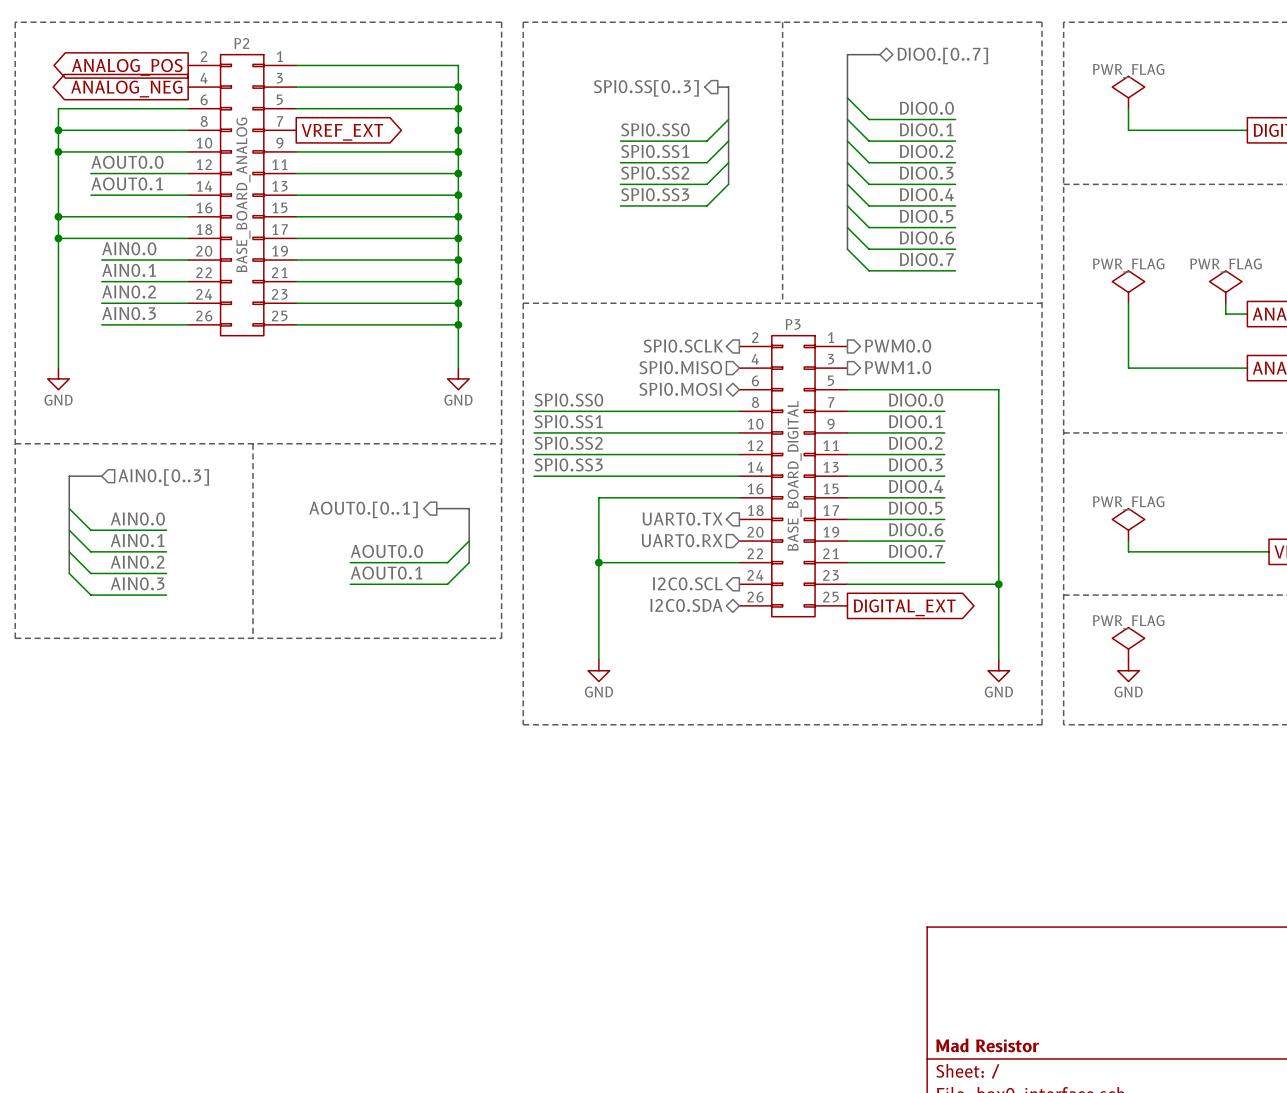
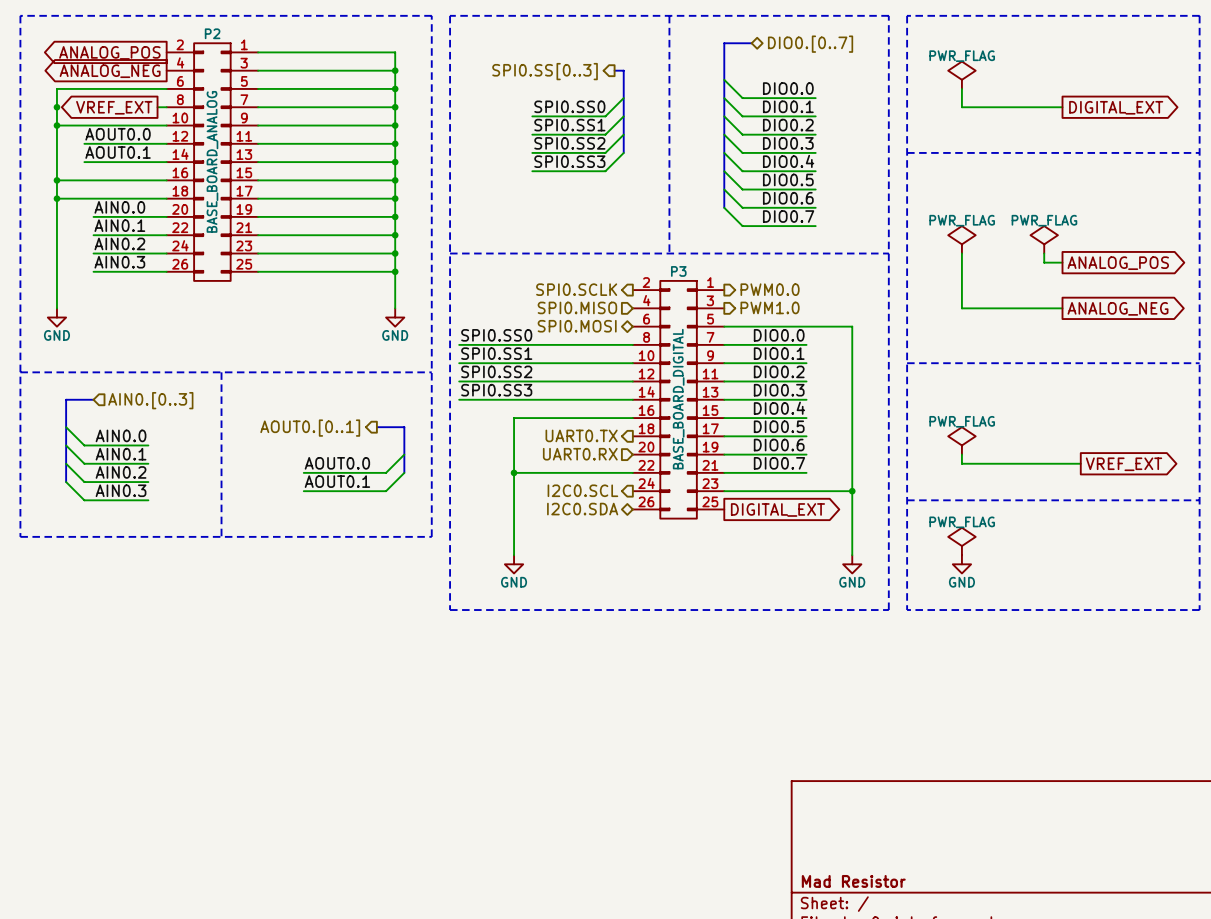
wire: (58, 130) (177, 130) -> none
wire: none -> (258, 107) (395, 107)
global label rotation: 0° (342, 132) -> 180° (114, 107)
global label position: VREF_EXT (342, 132) -> VREF_EXT (114, 107)

